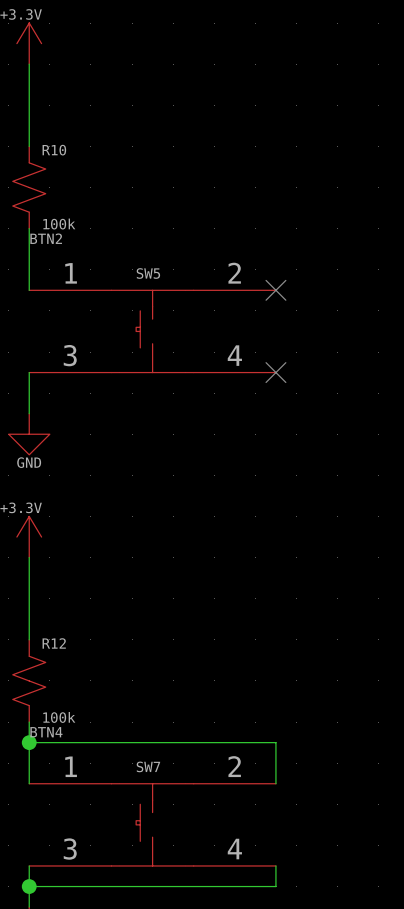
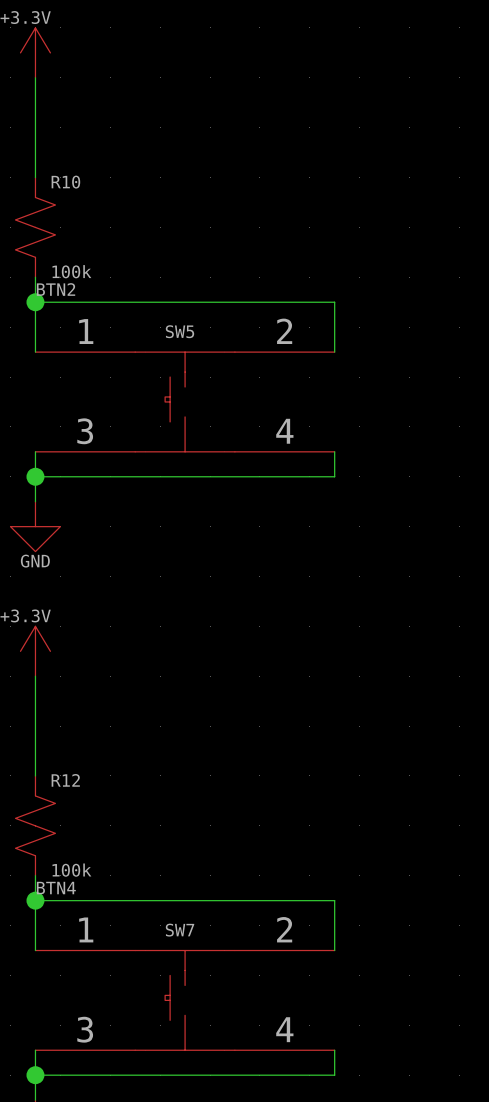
wire: none -> (35, 302) (334, 302) (334, 352)
junction: none -> (35, 302)
no-connect mark: (275, 290) -> none
wire: none -> (334, 451) (334, 476) (35, 476)
no-connect mark: (275, 372) -> none
junction: none -> (35, 476)

